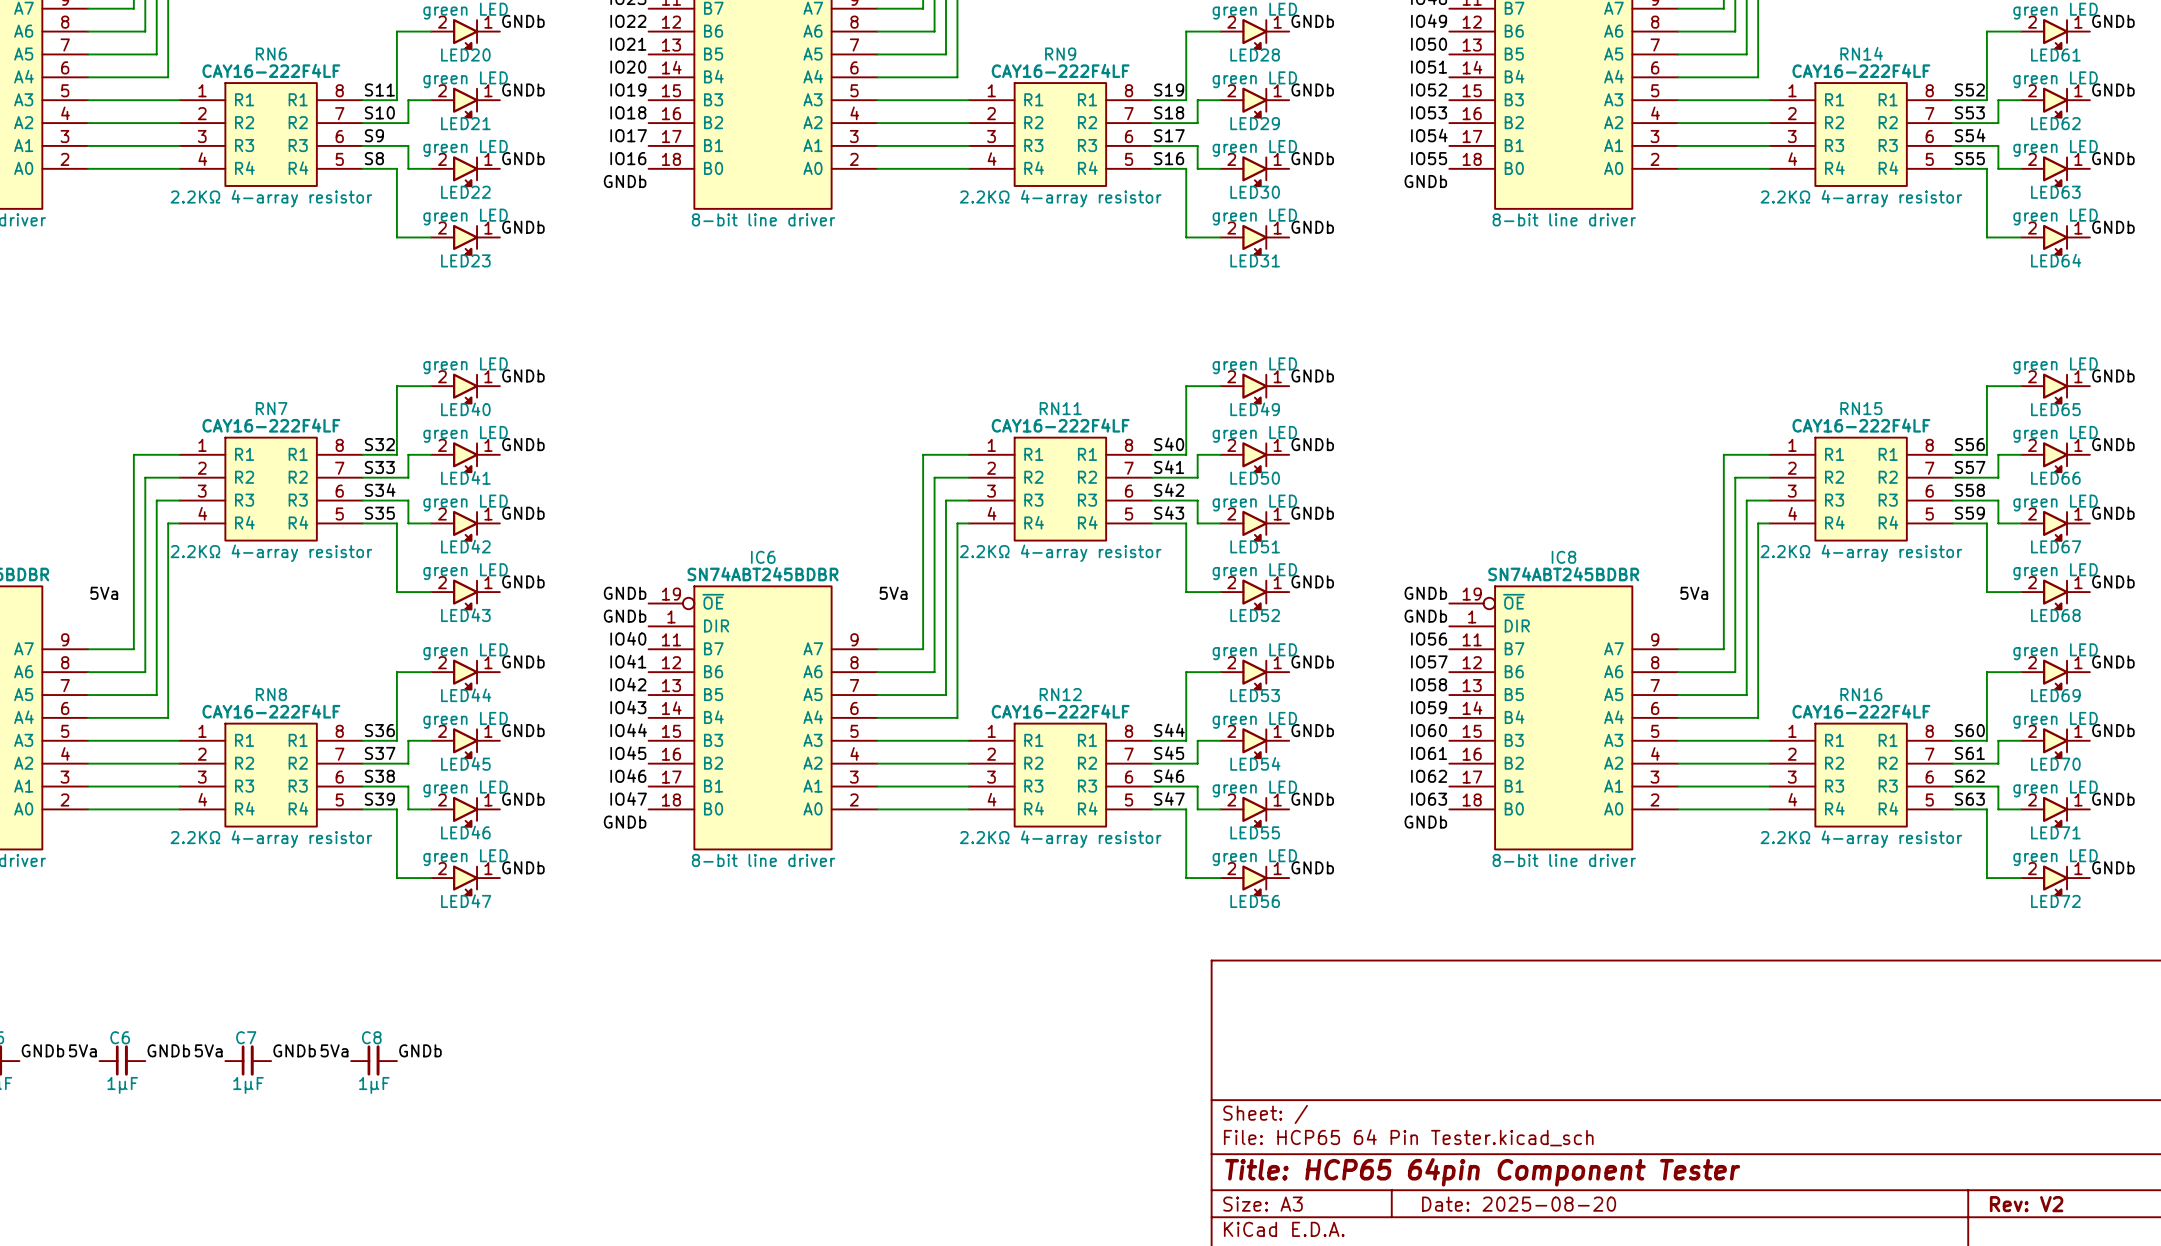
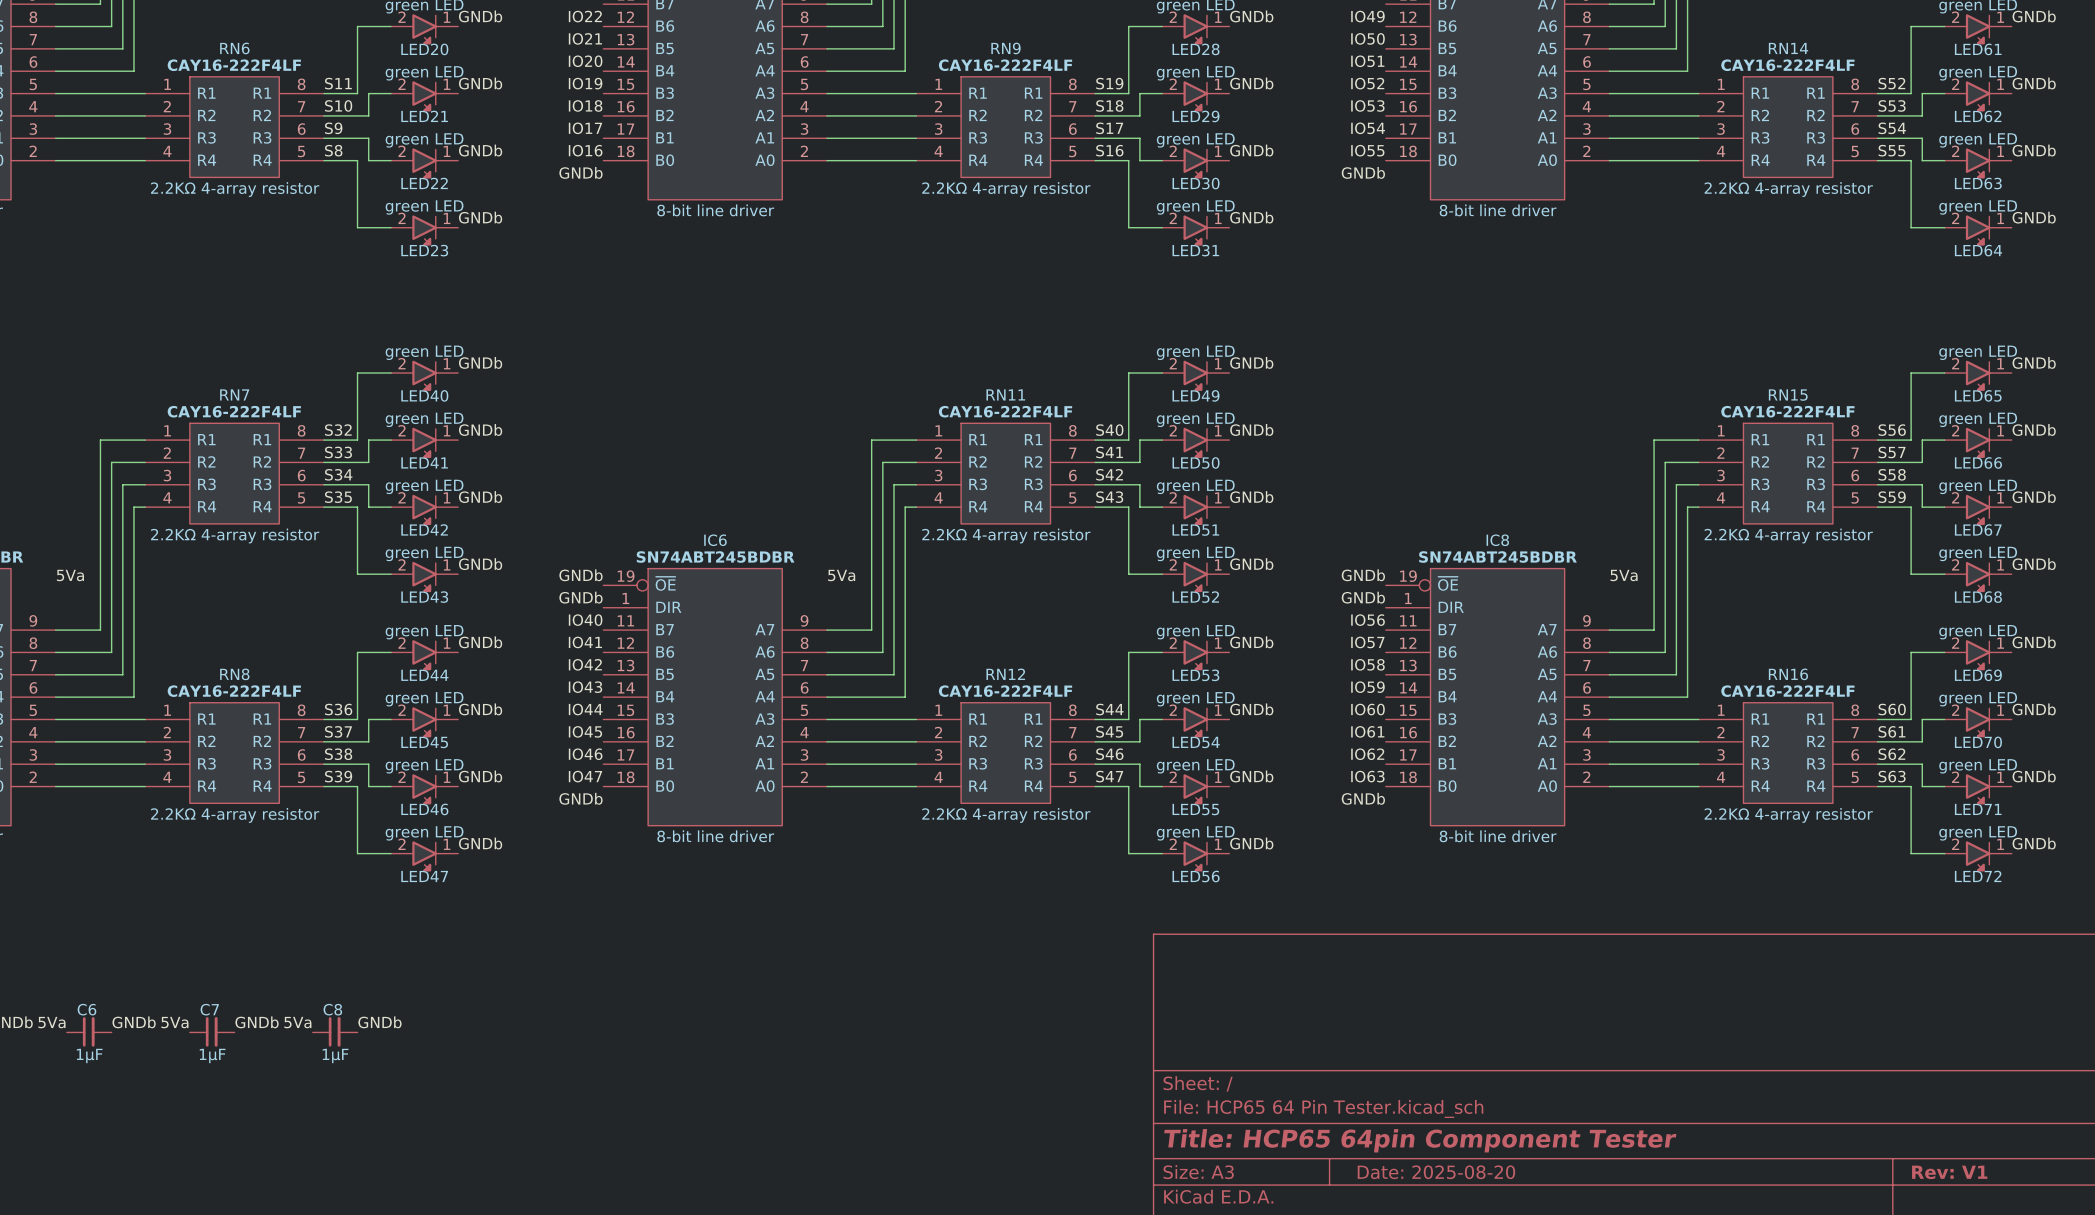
title block: Rev: V2 (2026, 1204) -> Rev: V1 (1949, 1172)

